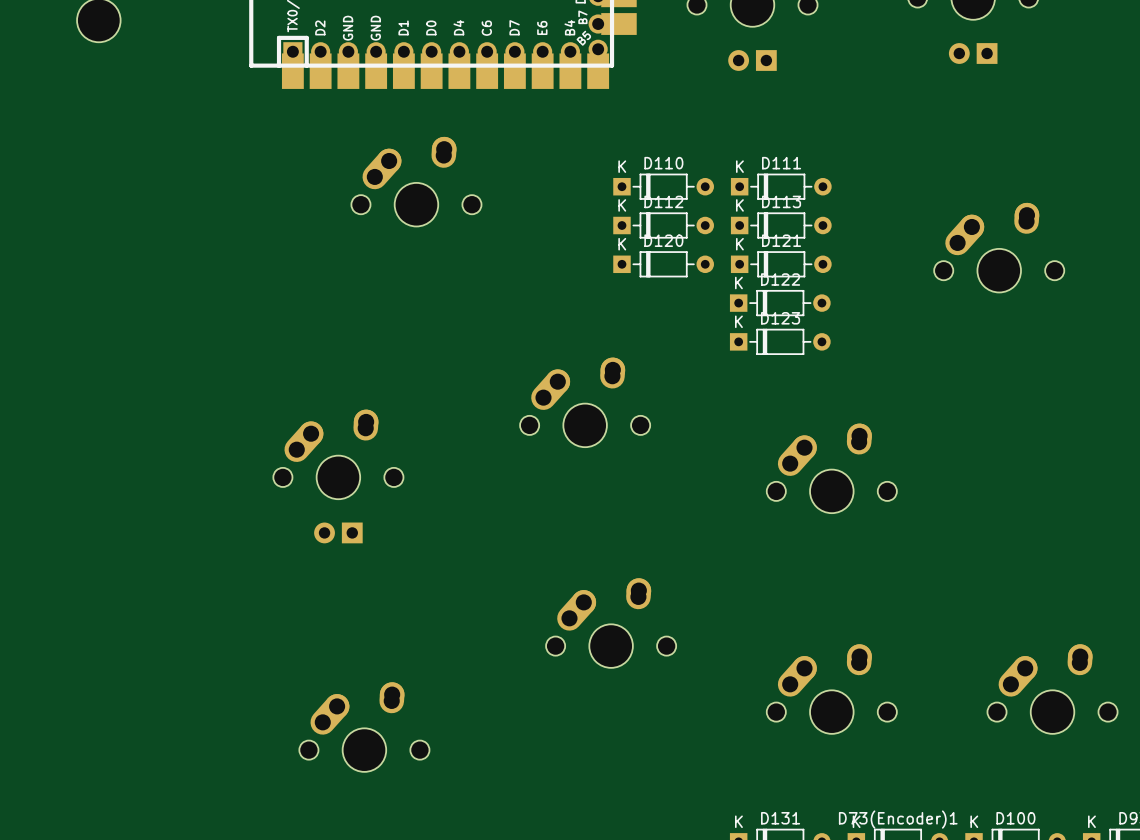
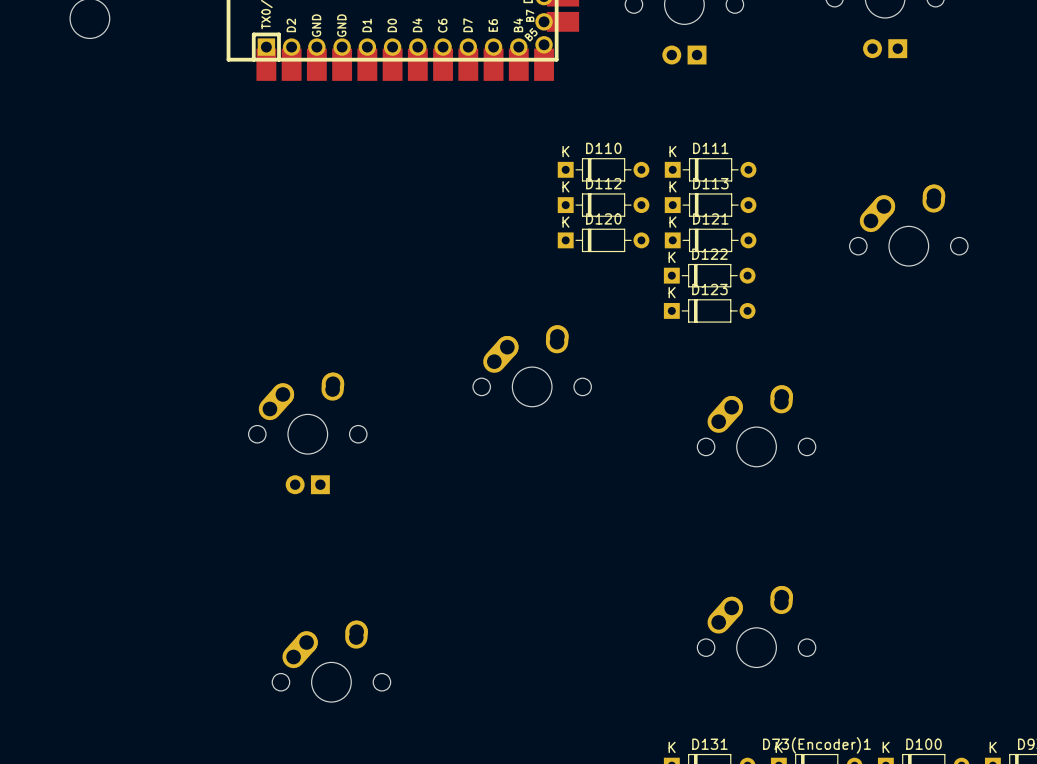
part: (416, 181) -> none
part: (611, 623) -> none
part: (1052, 689) -> none

